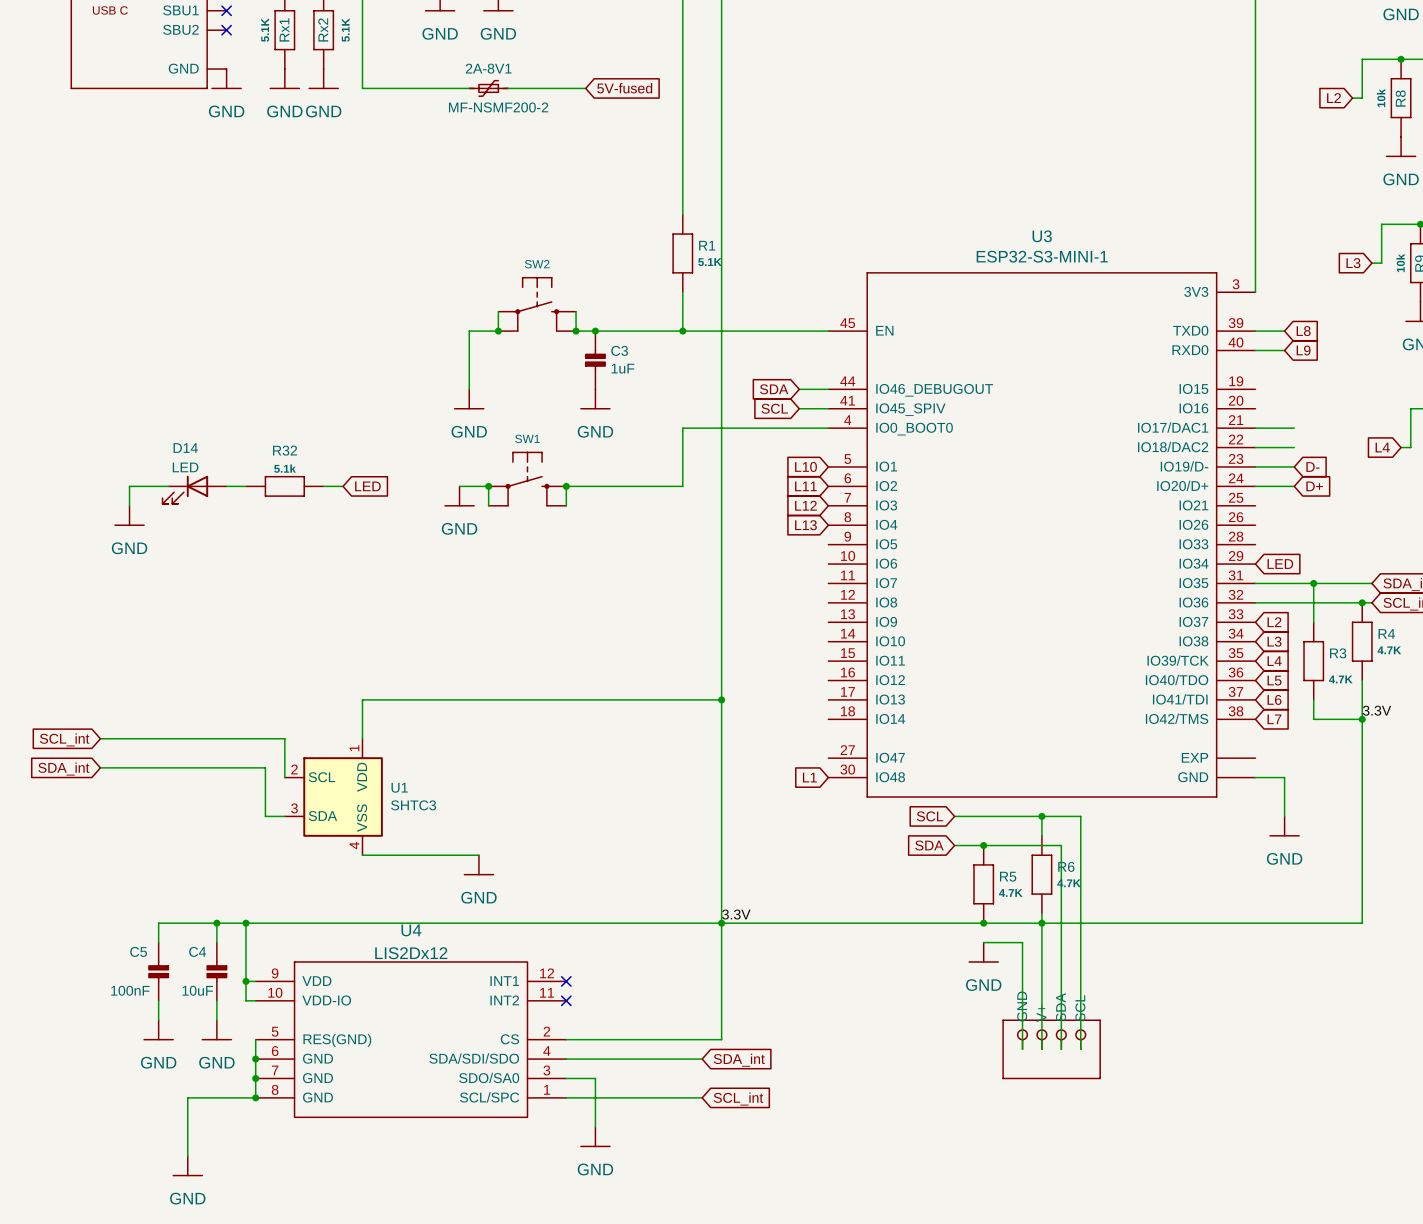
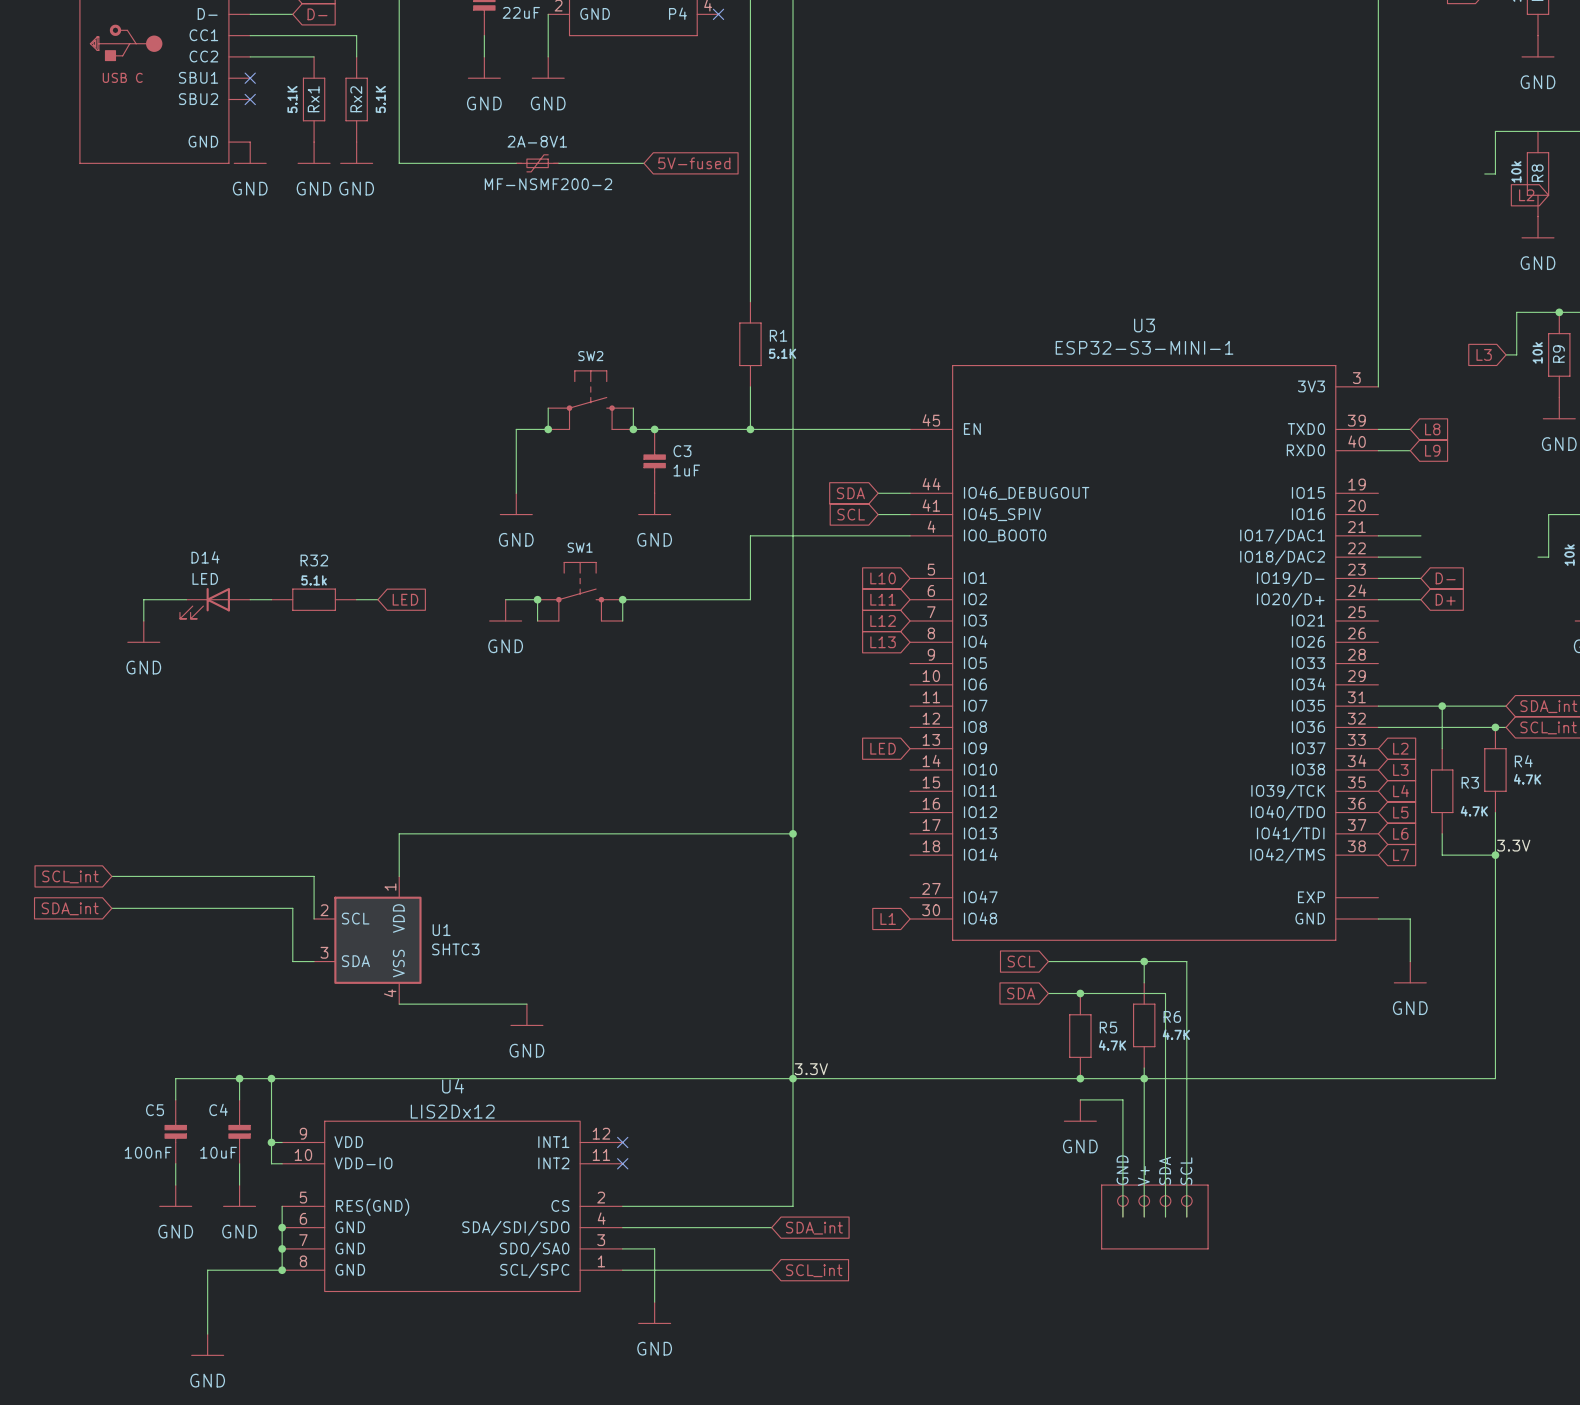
junction: (1401, 59) -> none
global label position: L2 (1333, 98) -> L2 (1526, 195)
global label: L4 (1382, 447) -> none
global label: LED (1280, 564) -> none
global label: none -> LED (883, 748)

